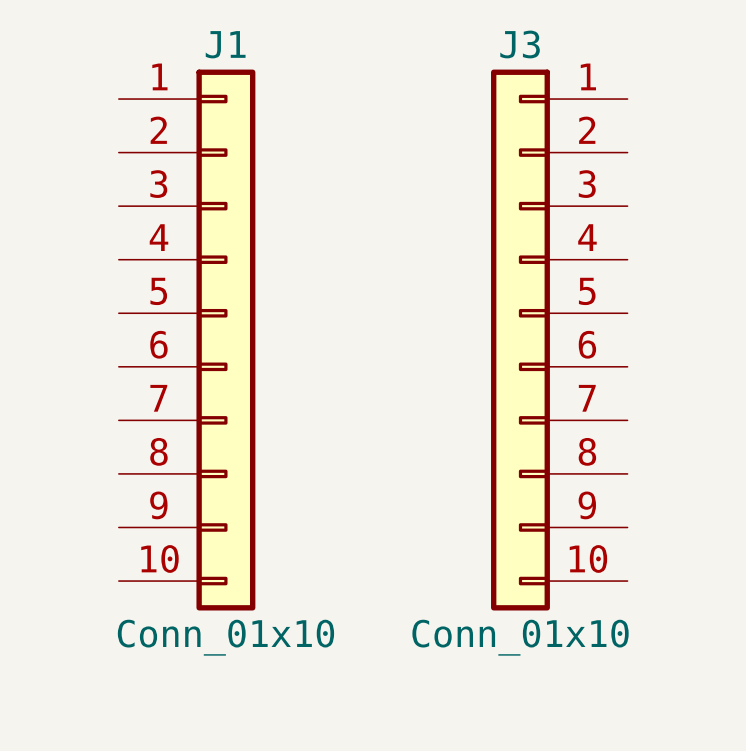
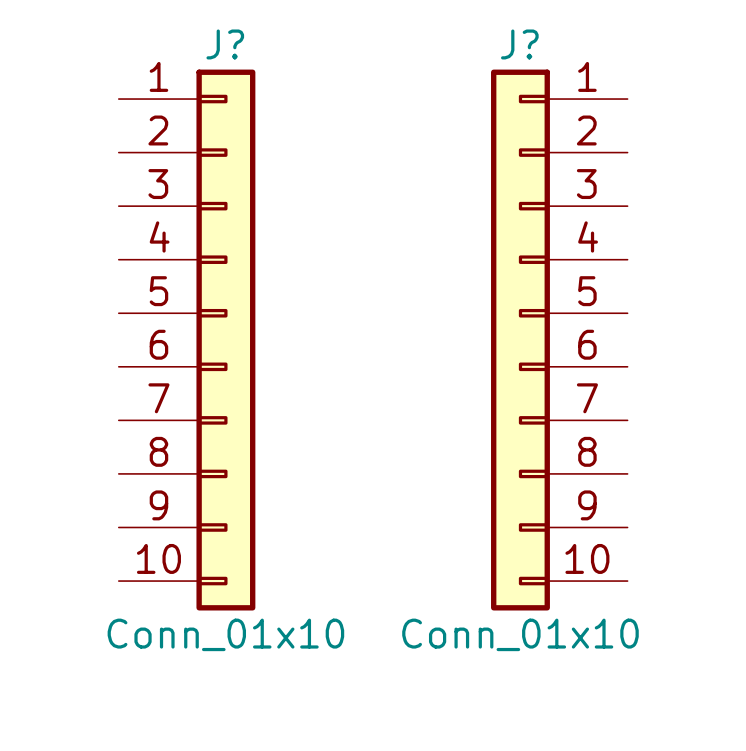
J1 name: J1 (225, 44) -> J? (225, 44)
J3 name: J3 (520, 44) -> J? (519, 44)

